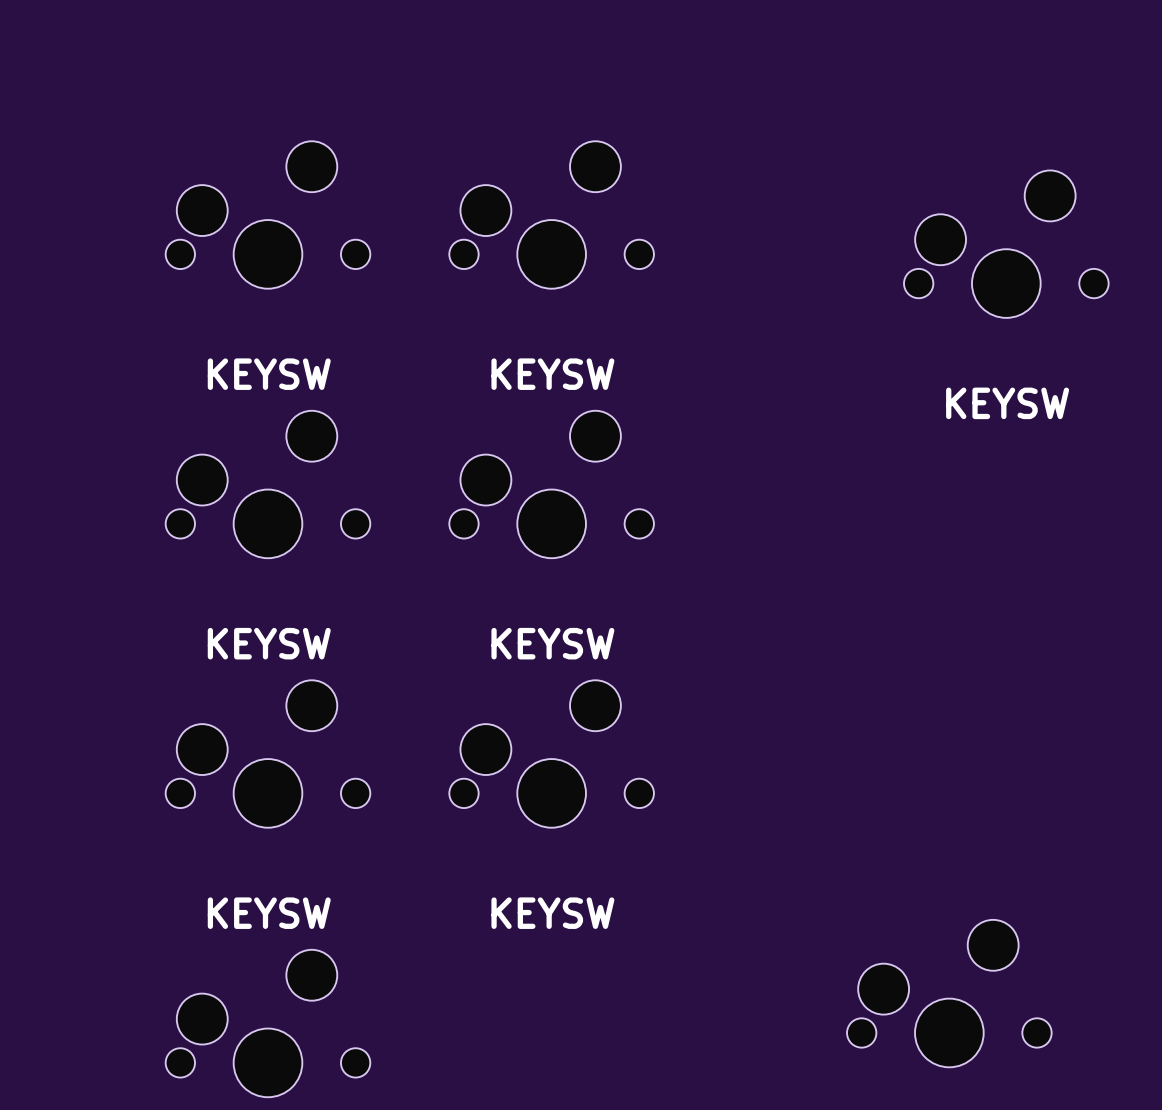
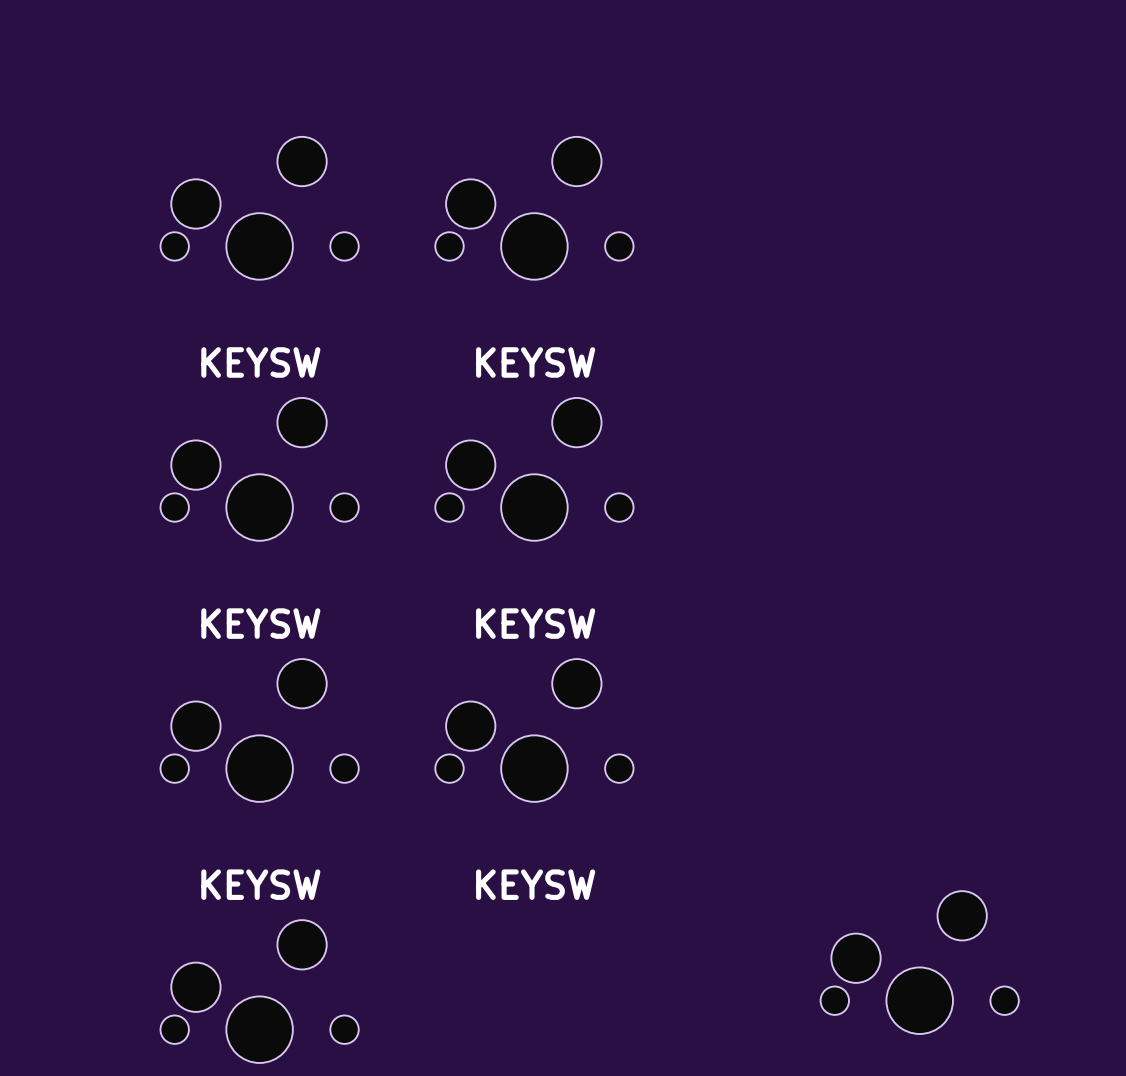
part: KEYSW (1006, 244) -> none

